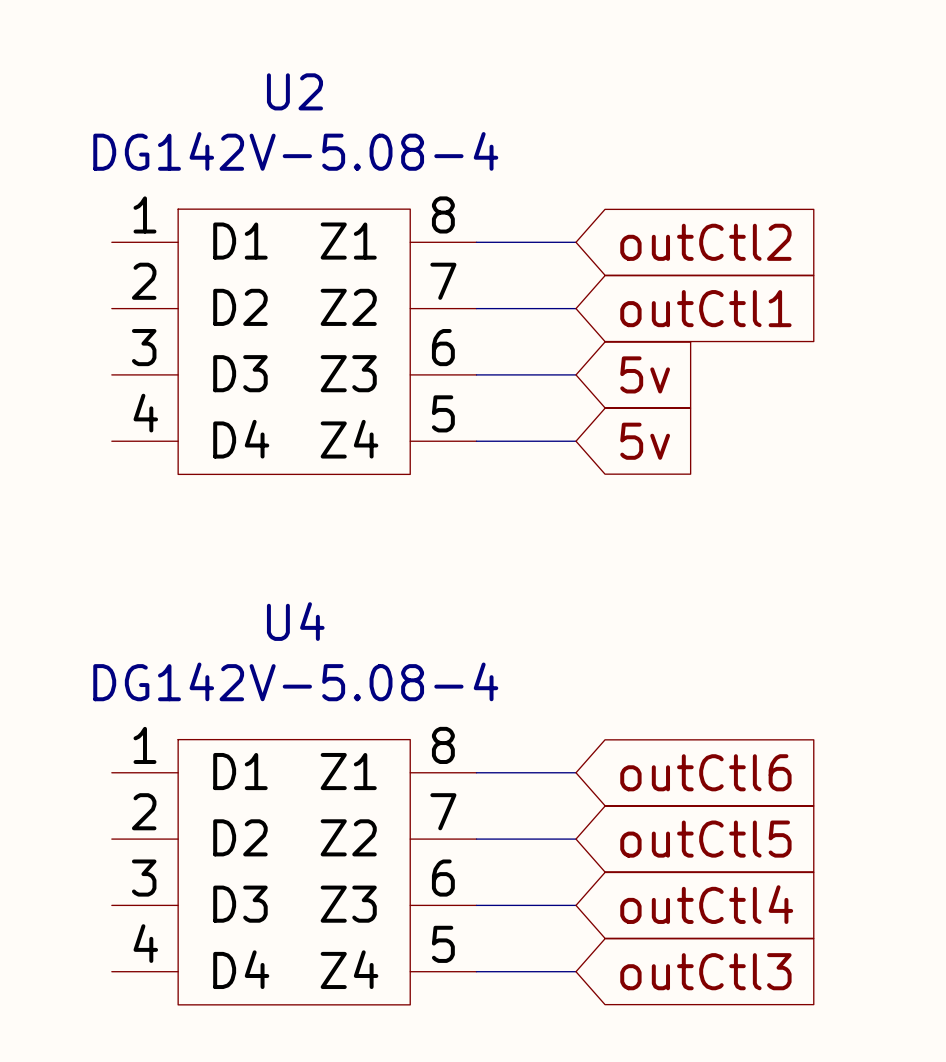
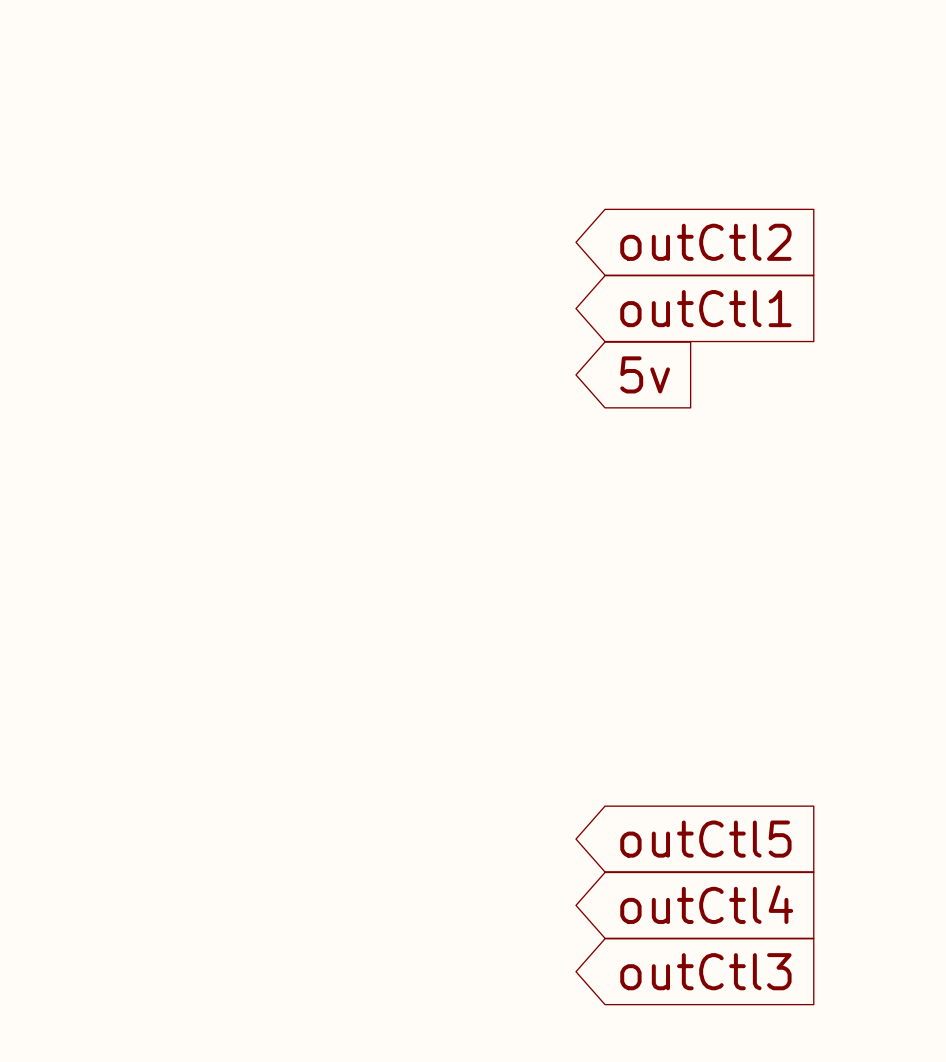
wire: (476, 242) (576, 242) -> none
wire: (476, 308) (576, 308) -> none
U2: DG142V-5.08-4 (294, 341) -> none
wire: (476, 374) (576, 374) -> none
wire: (476, 441) (576, 441) -> none
global label: 5v (645, 441) -> none
wire: (476, 772) (576, 772) -> none
global label: outCtl6 (705, 772) -> none
wire: (476, 839) (576, 839) -> none
U4: DG142V-5.08-4 (294, 872) -> none
wire: (476, 905) (576, 905) -> none
wire: (476, 971) (576, 971) -> none

